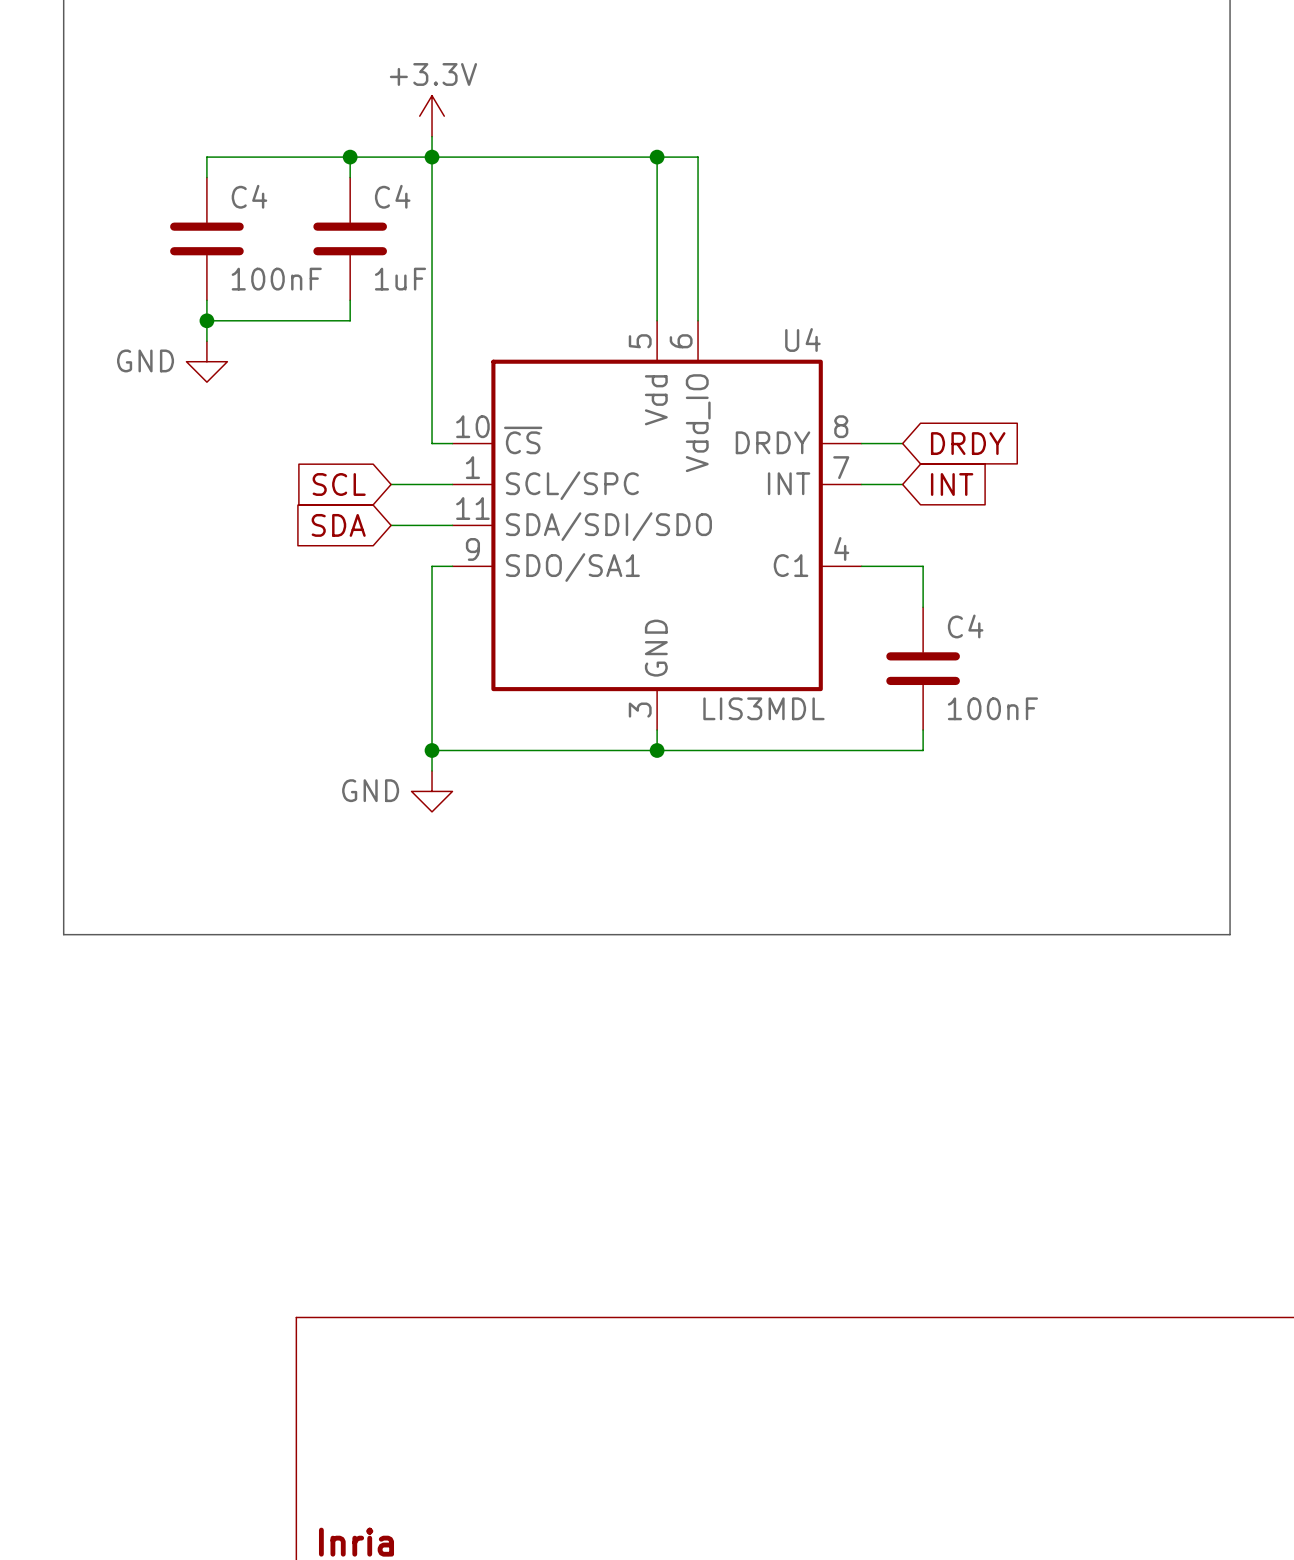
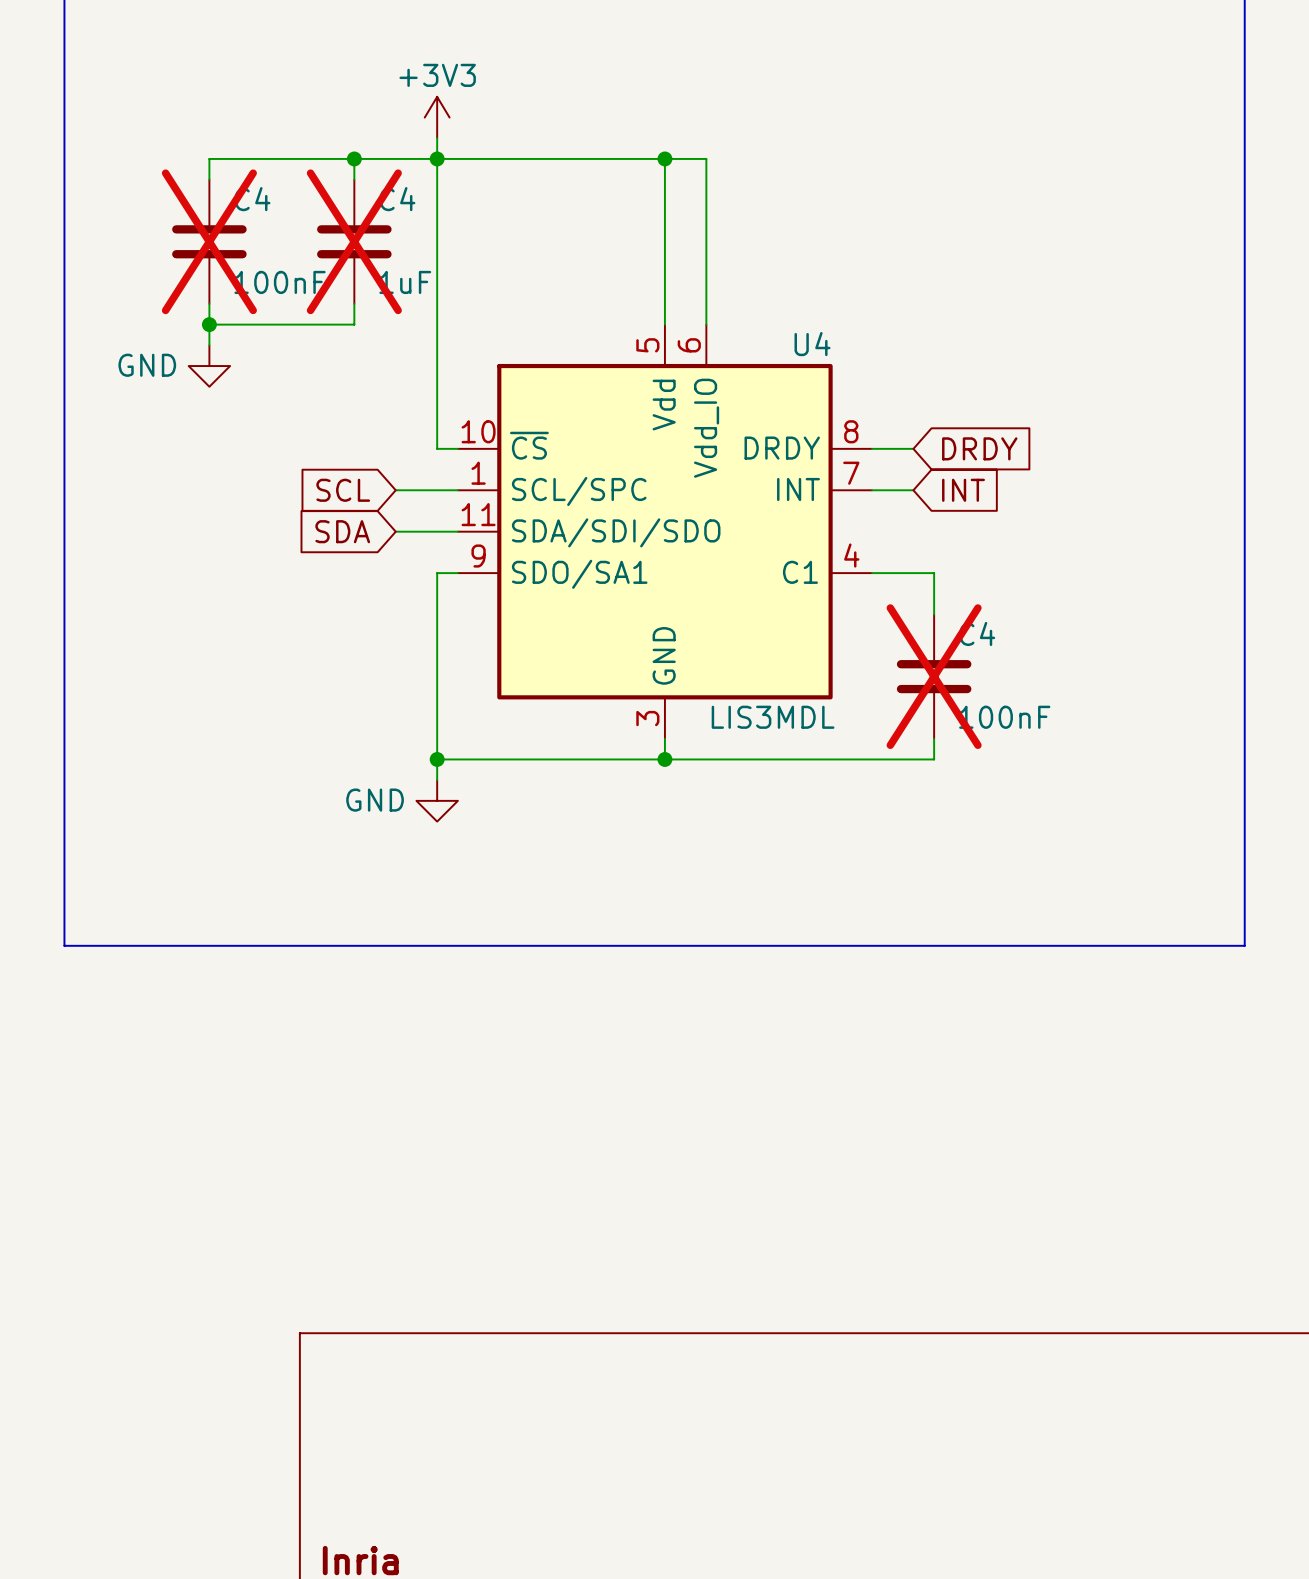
power symbol: +3.3V (432, 116) -> +3V3 (437, 117)
C4 do-not-place cross: none -> (209, 241)
C4 do-not-place cross: none -> (354, 241)
C4 do-not-place cross: none -> (934, 676)

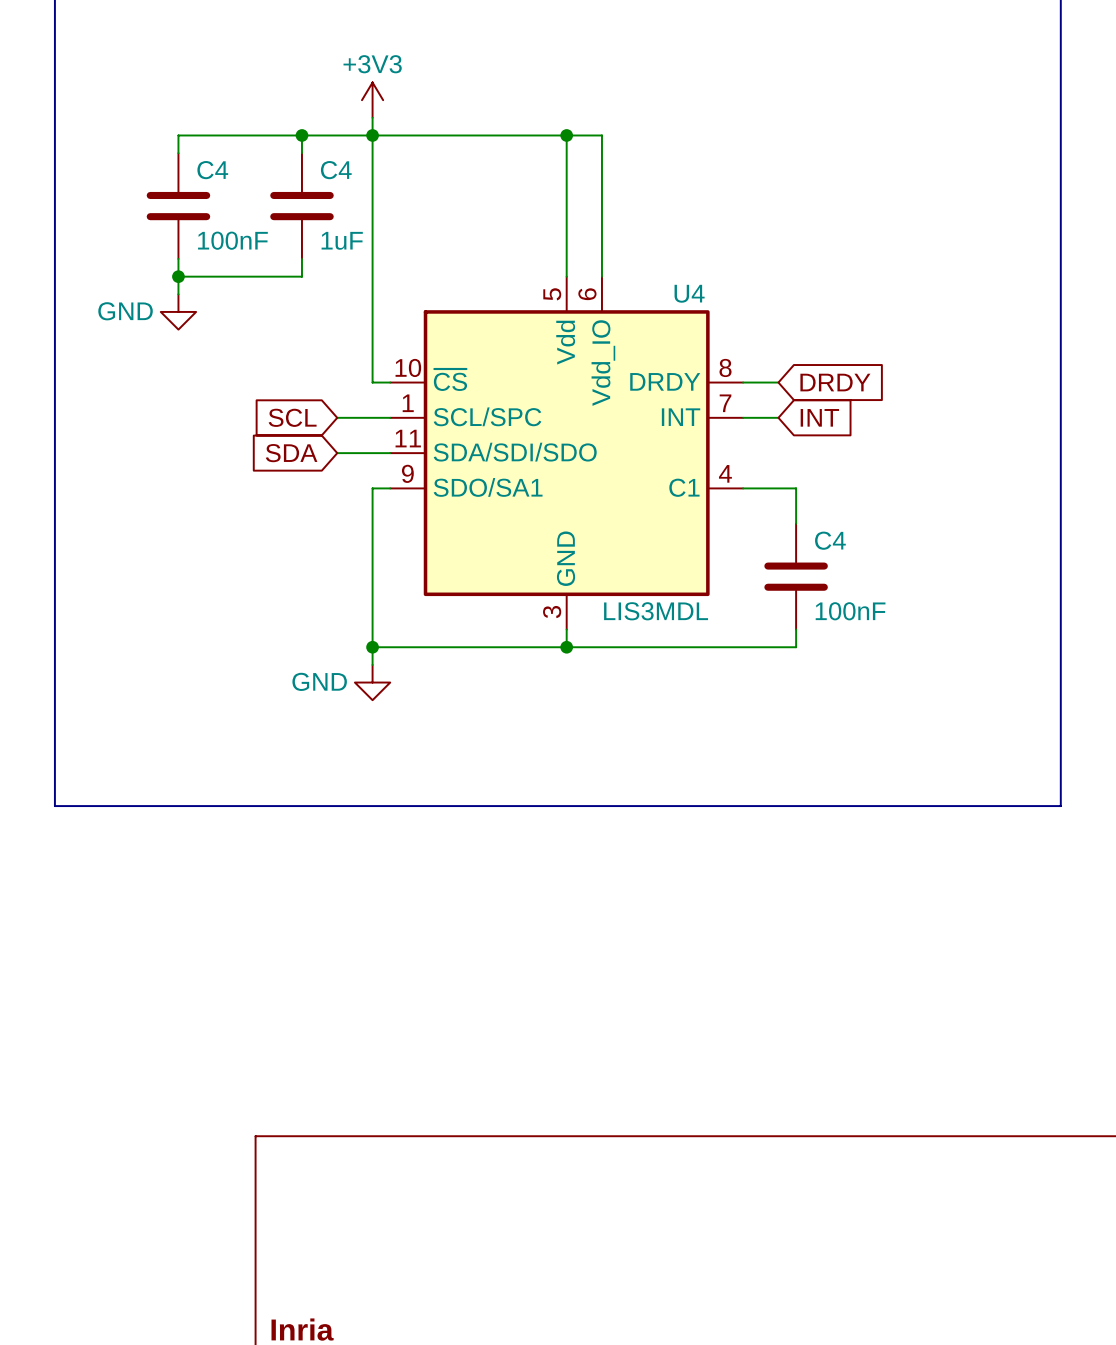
C4 do-not-place cross: (209, 241) -> none
C4 do-not-place cross: (354, 241) -> none
C4 do-not-place cross: (934, 676) -> none

